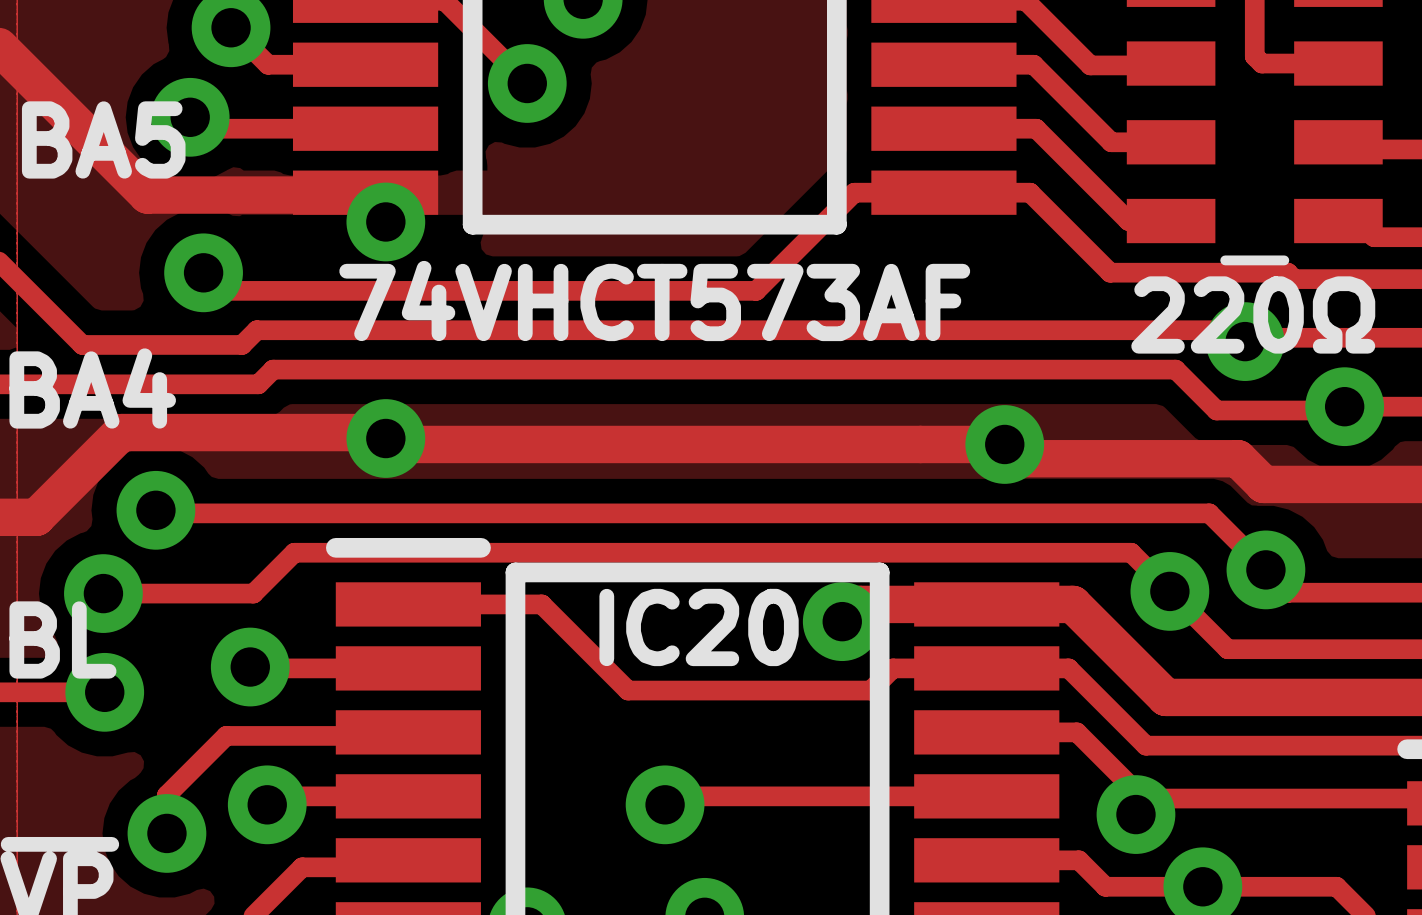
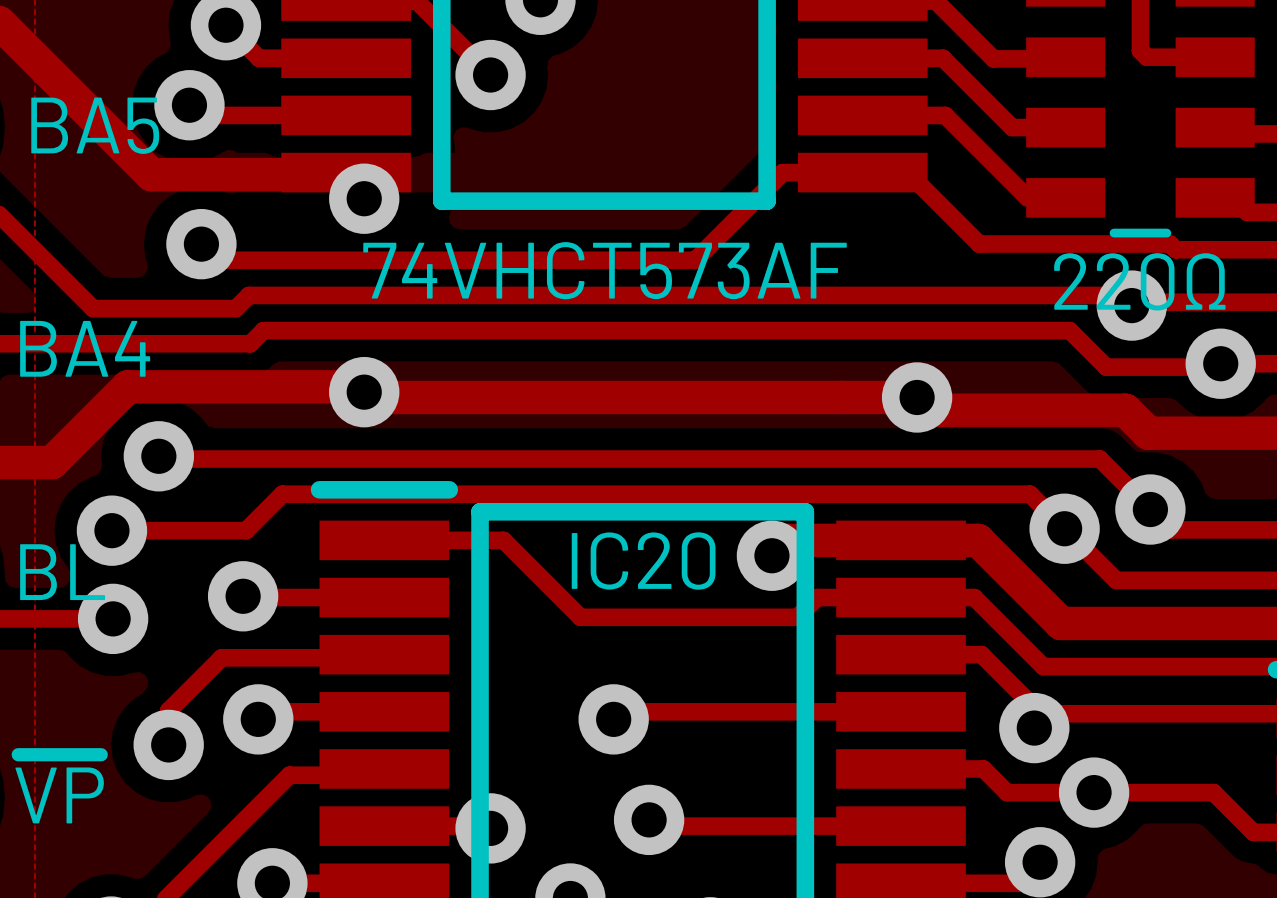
track: (943, 192) (1030, 192) (1110, 272) -> (907, 172) (979, 244) (1011, 244)

